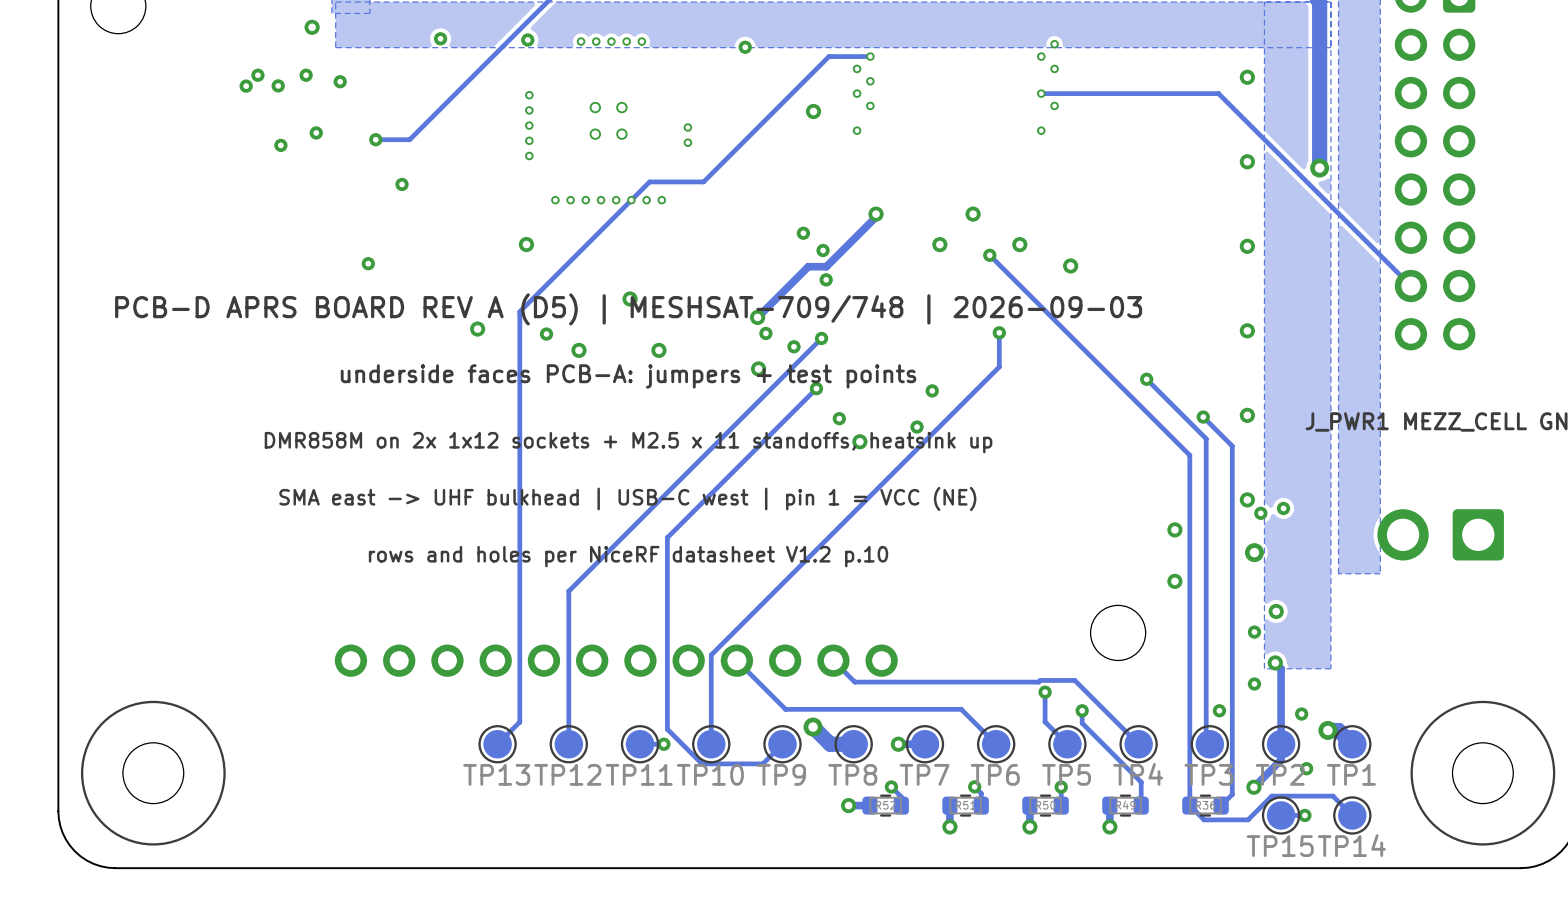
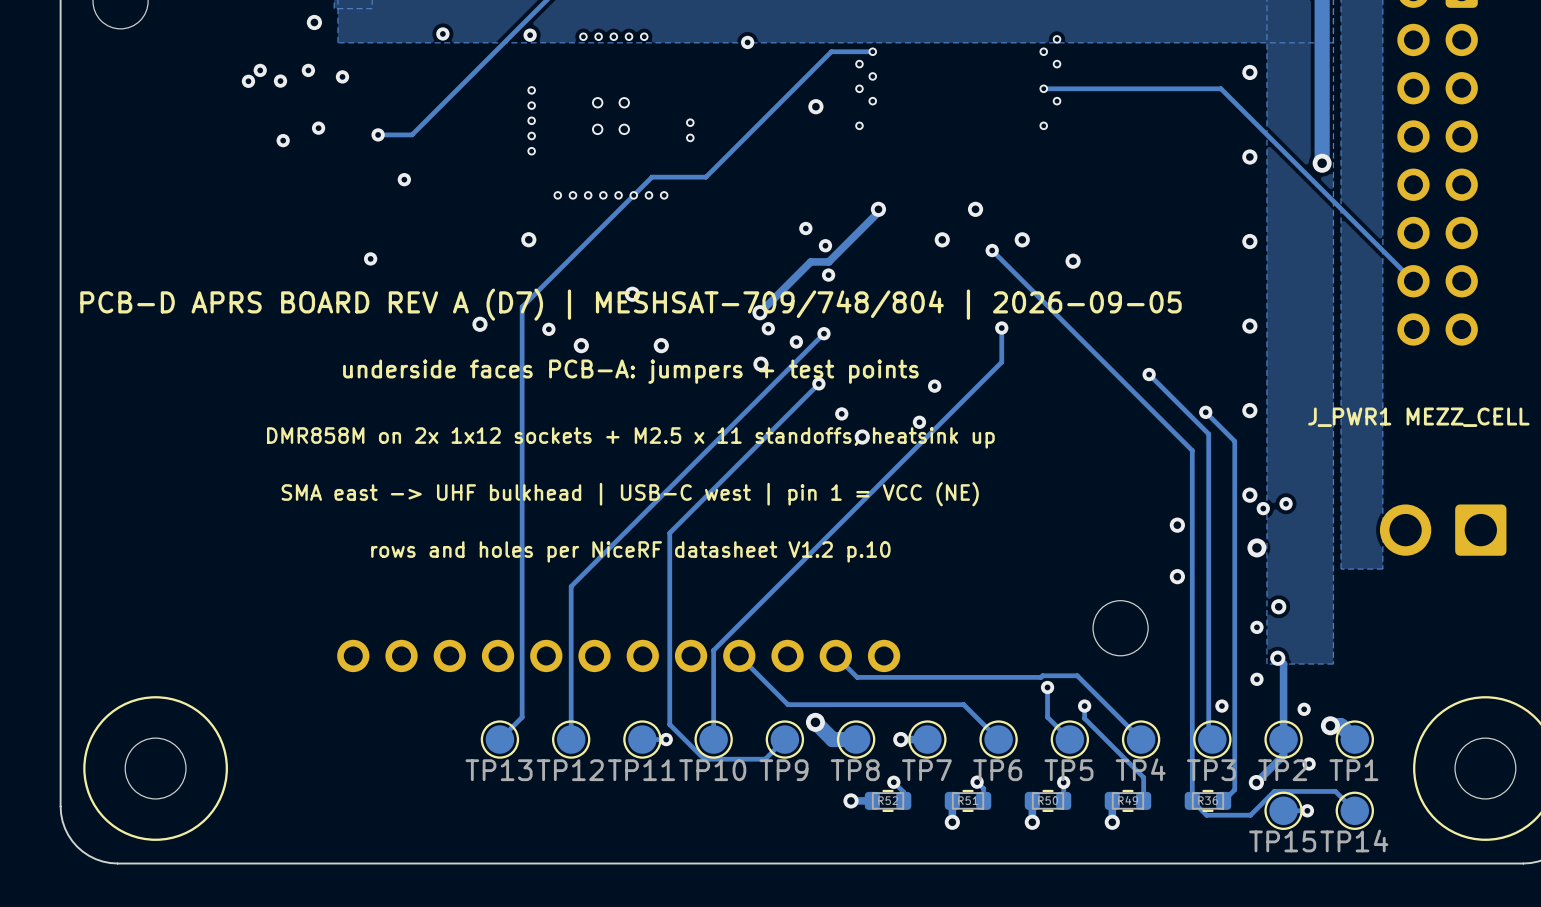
text: PCB-D APRS BOARD REV A (D5) | MESHSAT-709/748 | 2026-09-03 (628, 309) -> PCB-D APRS BOARD REV A (D7) | MESHSAT-709/748/804 | 2026-09-05 (630, 304)

